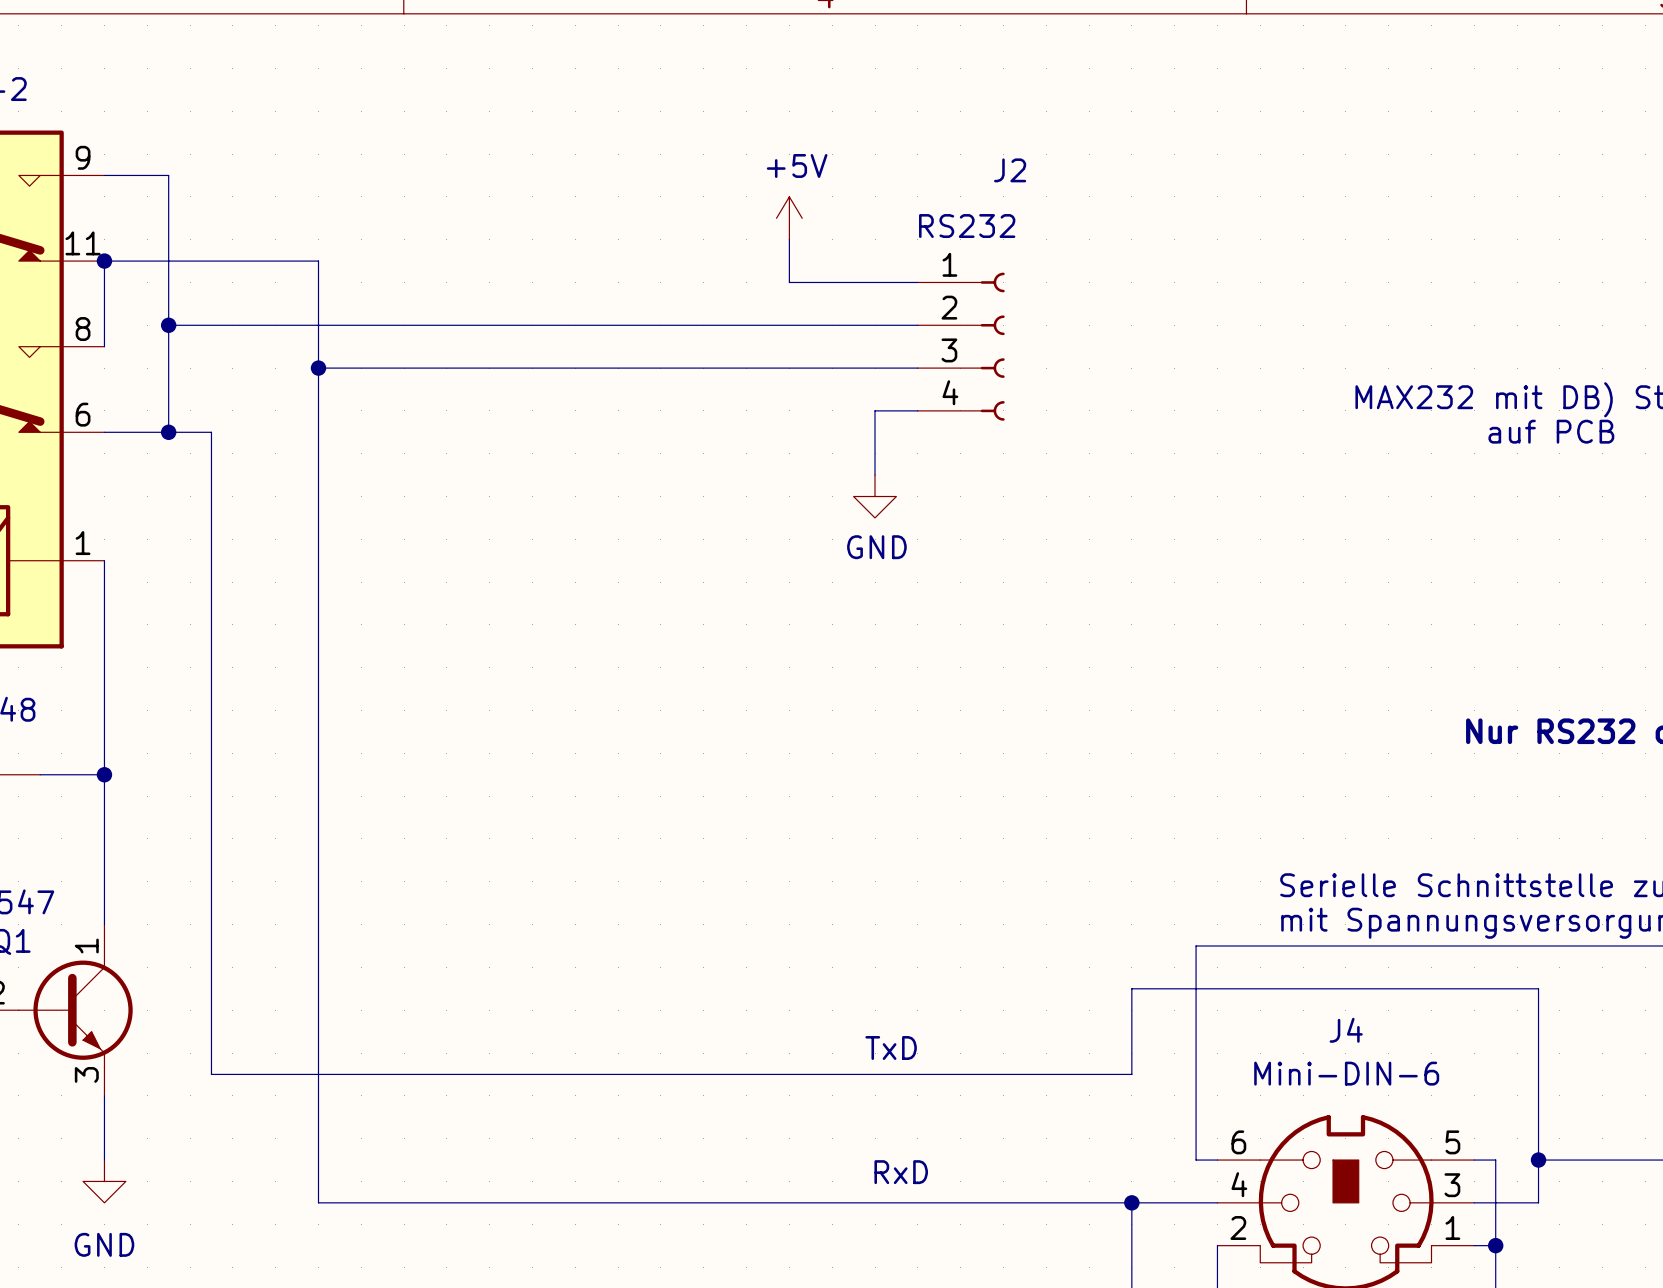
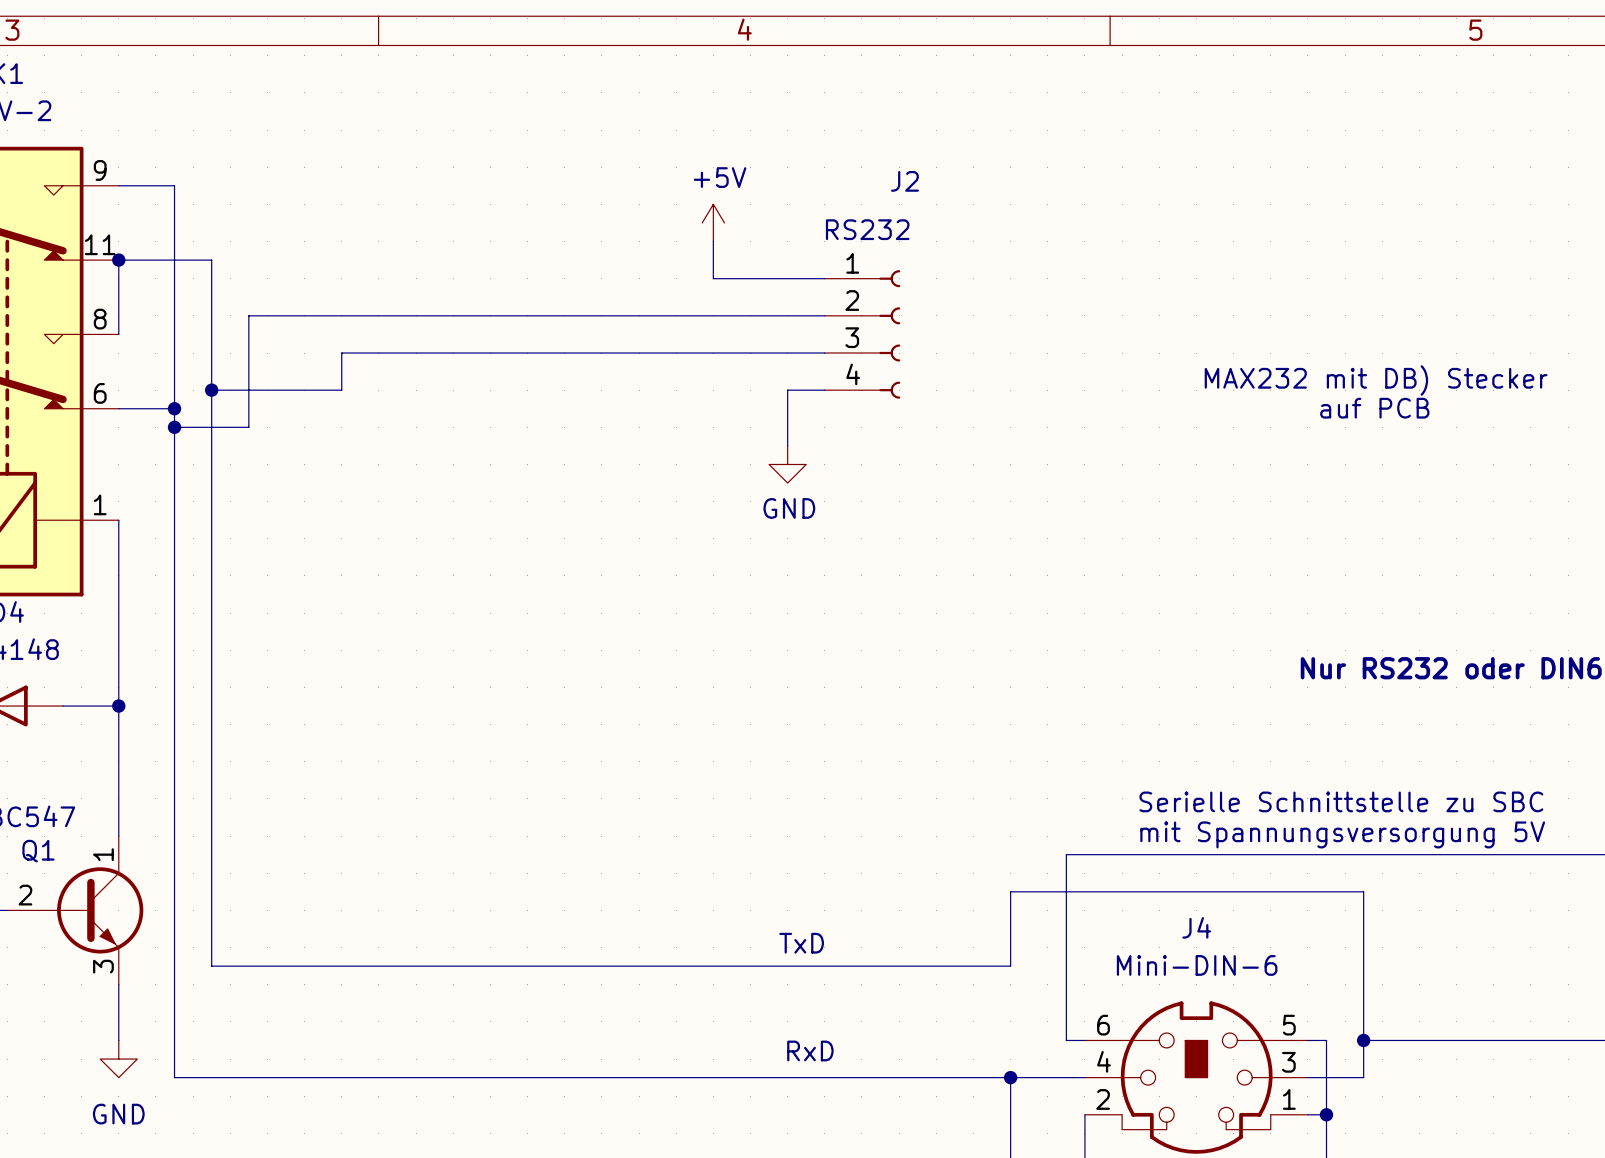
wire: (211, 261) (318, 261) (318, 1202) -> (174, 408) (174, 1077) (304, 1077)
wire: (168, 325) (254, 325) -> (174, 427) (248, 427) (248, 315)
junction: (168, 325) -> none
wire: (318, 368) (361, 368) -> (211, 390) (341, 390) (341, 353)
junction: (318, 368) -> none
junction: none -> (211, 390)
wire: (168, 432) (211, 432) -> (211, 260) (211, 408)
junction: none -> (174, 427)

